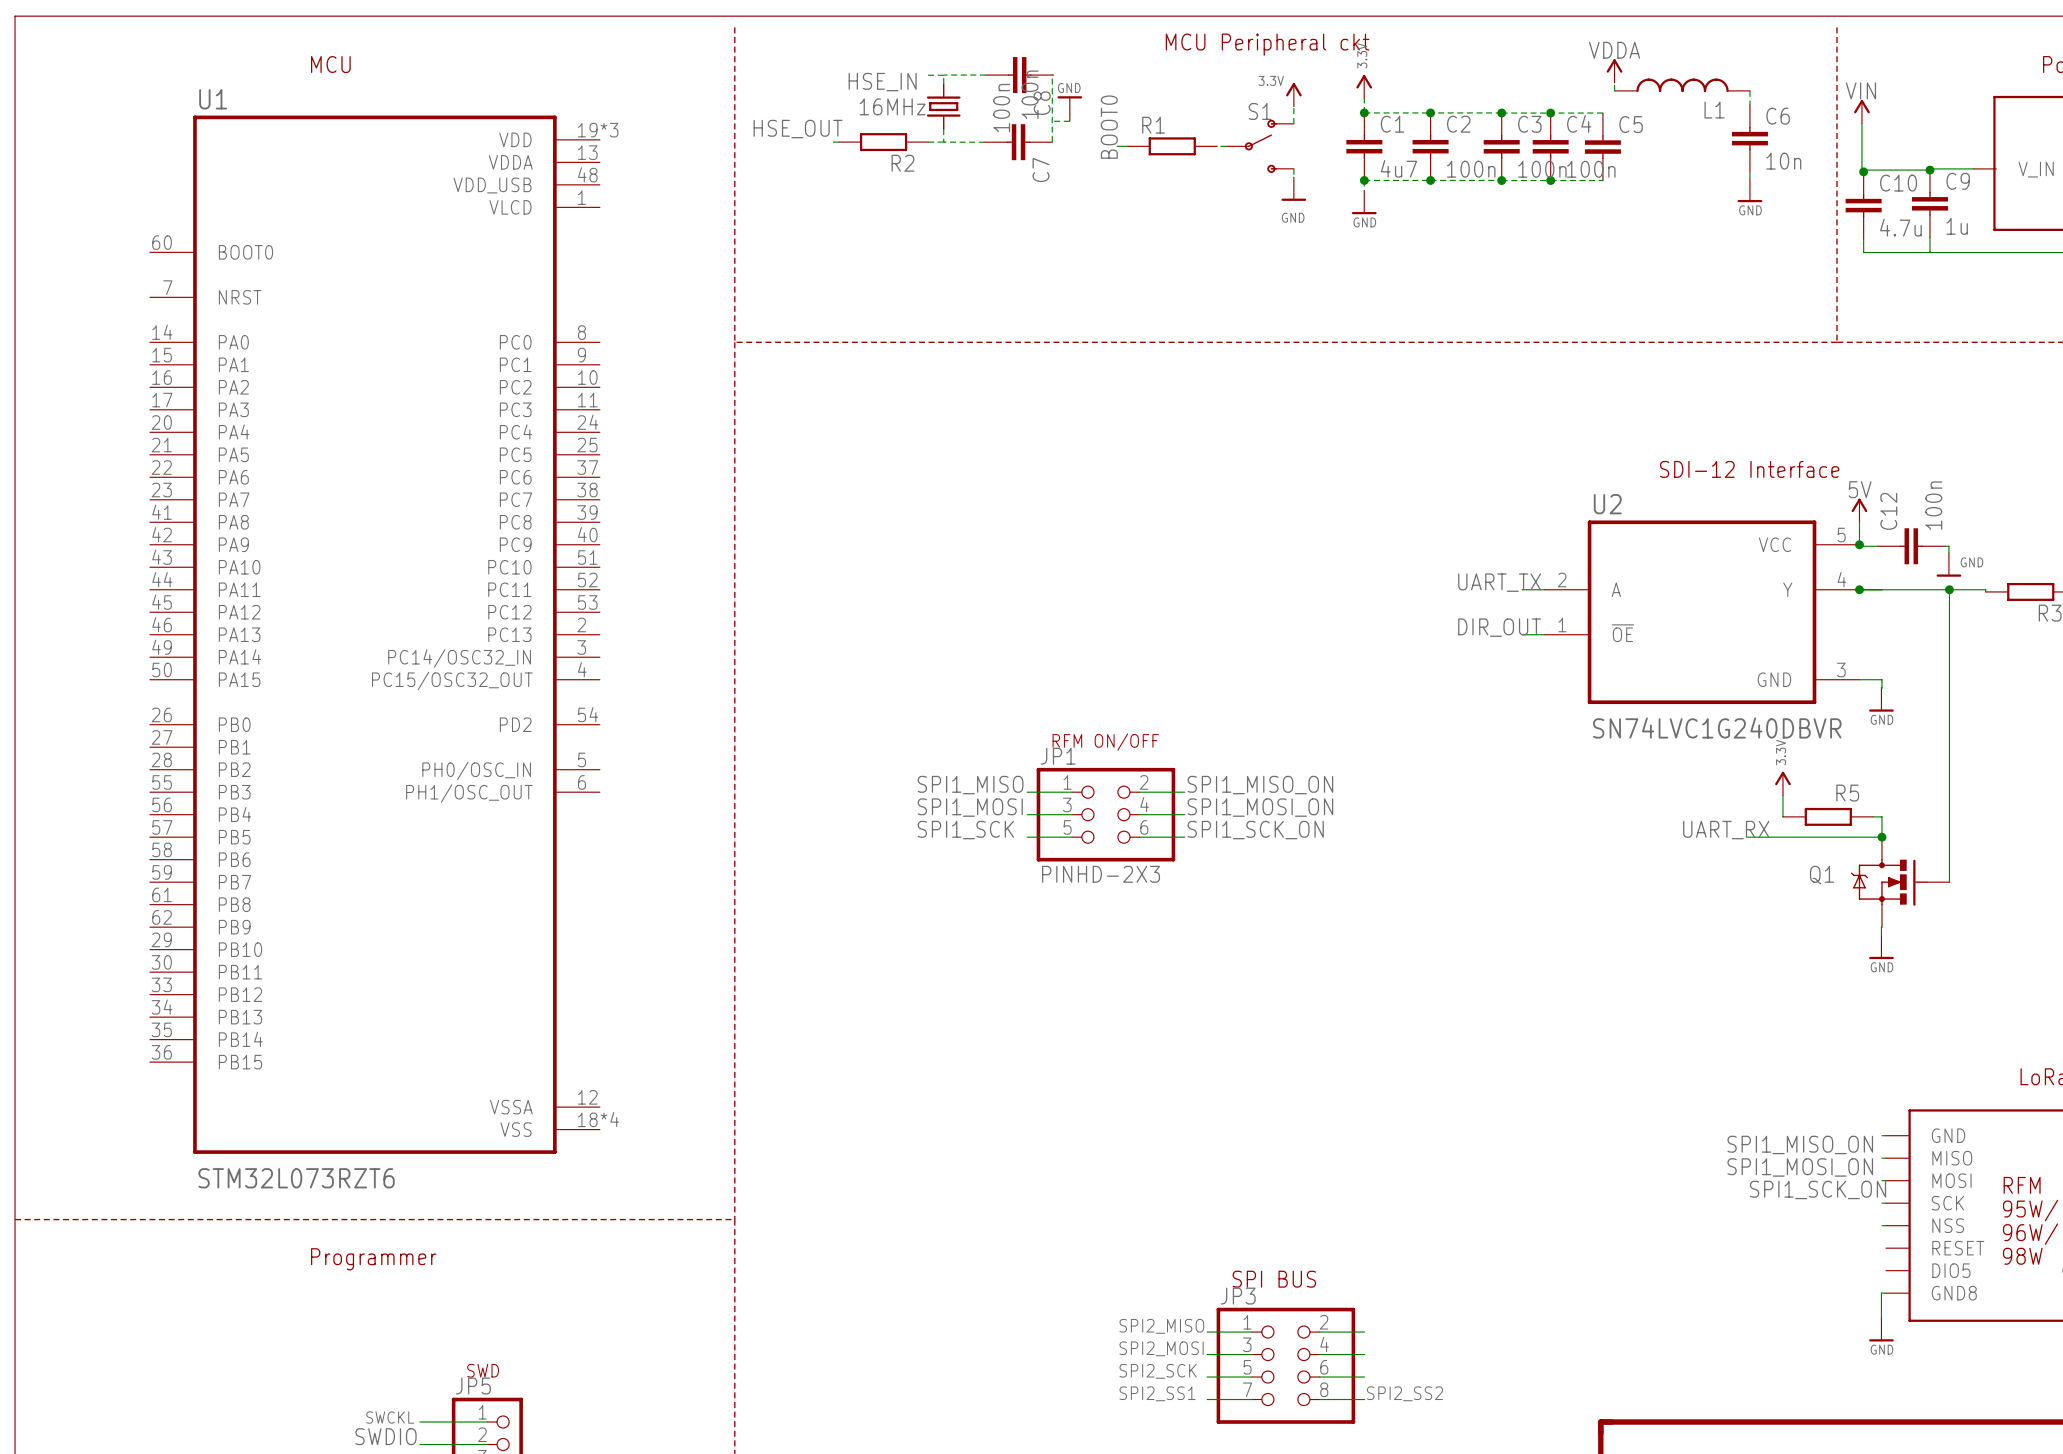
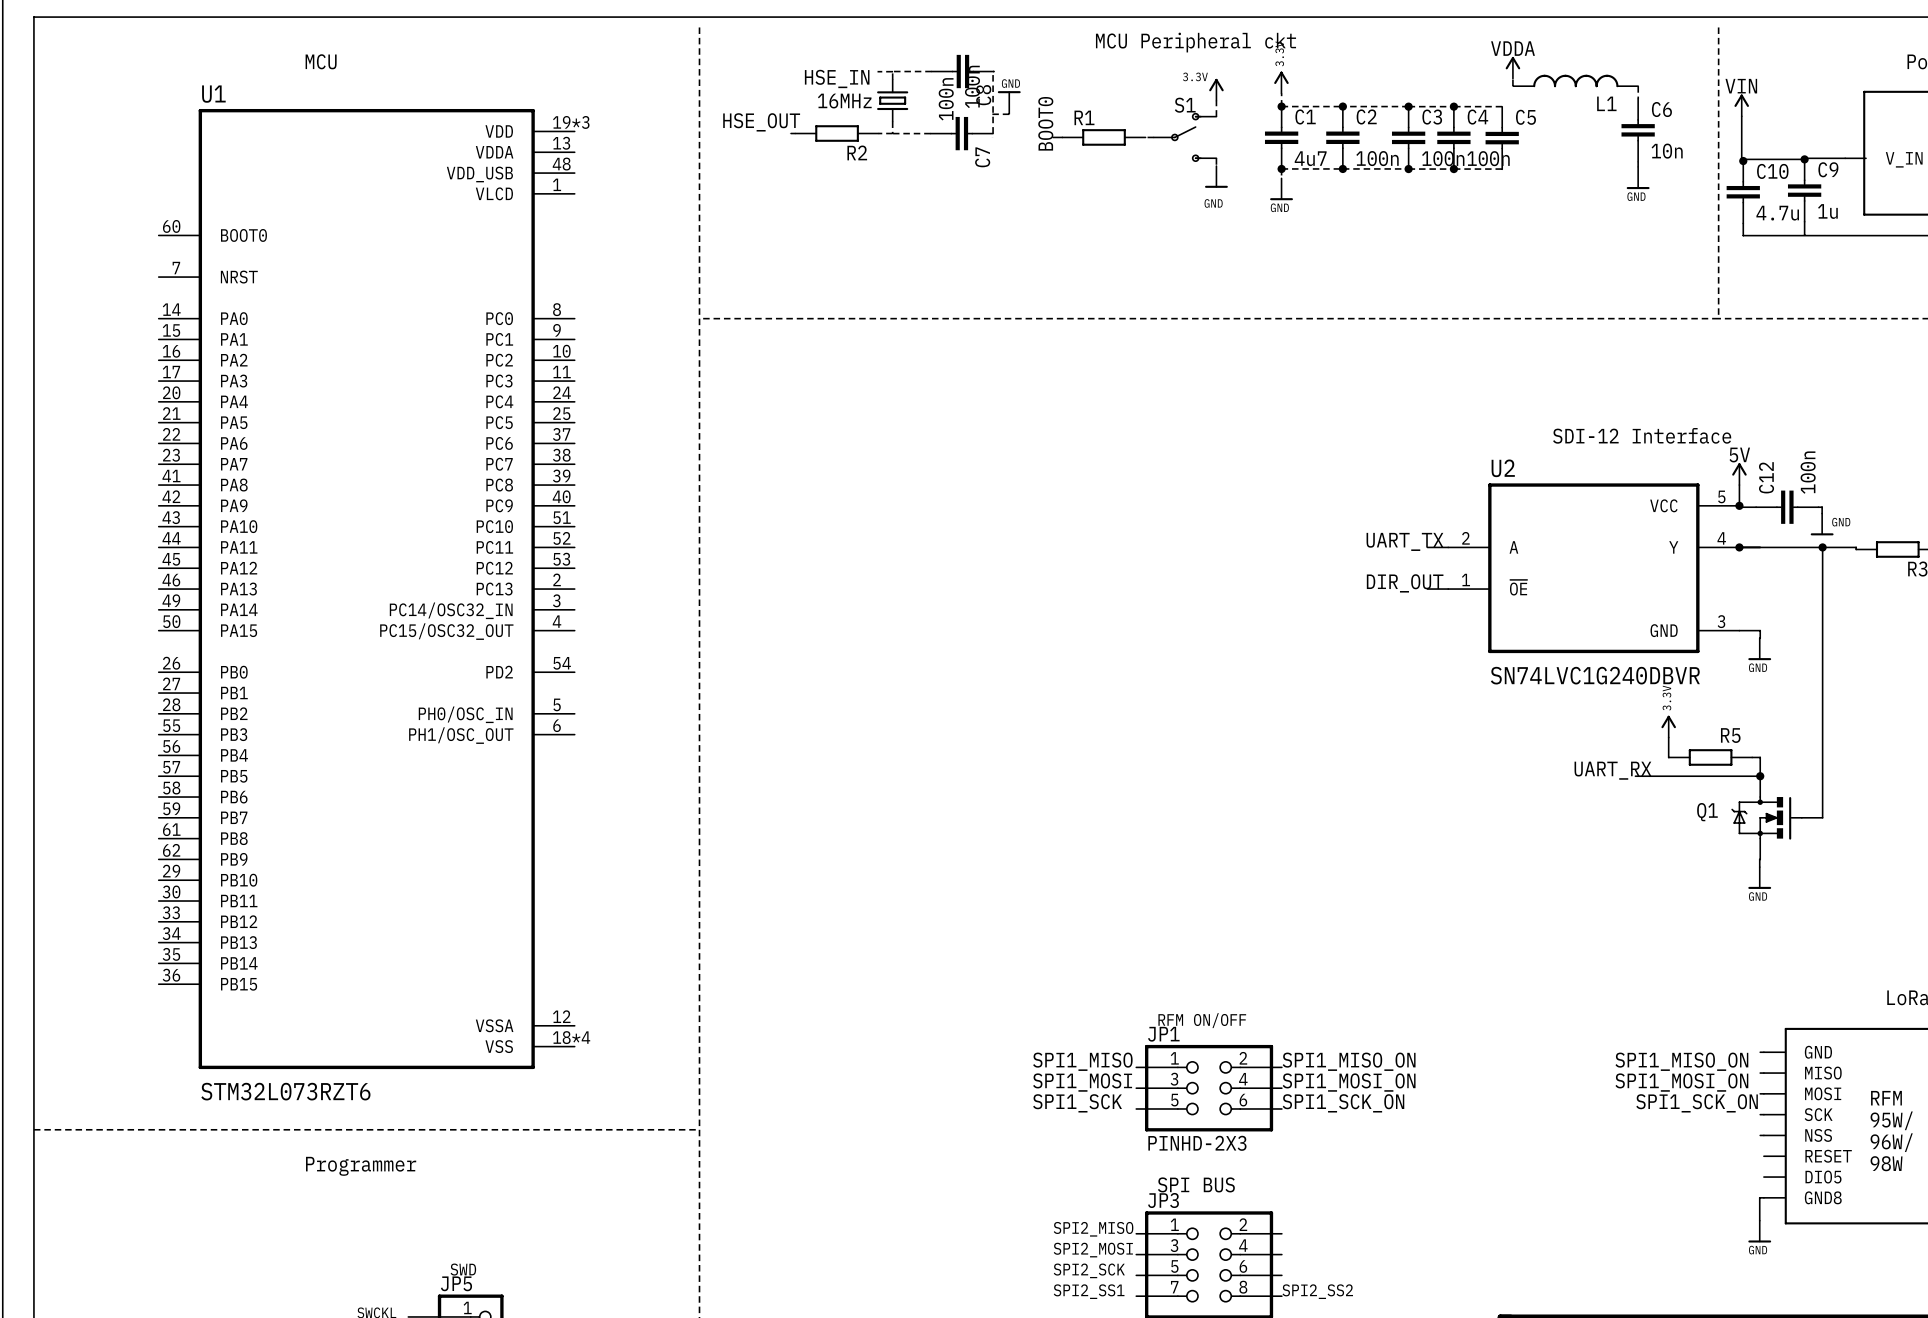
text: RFM ON/OFF (1105, 742) -> none
label: SPI1_MISO (970, 785) -> none
label: SPI1_MISO_ON (1260, 785) -> none
wire: (1027, 792) (1072, 792) -> none
wire: (1139, 792) (1184, 792) -> none
label: SPI1_MOSI (970, 807) -> none
label: SPI1_MOSI_ON (1260, 807) -> none
wire: (1027, 814) (1072, 814) -> none
JP1 position: (1105, 814) -> (1209, 1088)
wire: (1139, 814) (1184, 814) -> none
label: SPI1_SCK (965, 830) -> none
label: SPI1_SCK_ON (1255, 830) -> none
wire: (1027, 837) (1072, 837) -> none
wire: (1139, 837) (1184, 837) -> none
text: none -> RFM ON/OFF (1202, 1020)
label: none -> SPI1_MISO (1082, 1061)
label: none -> SPI1_MISO_ON (1349, 1061)
wire: none -> (1136, 1067) (1177, 1067)
wire: none -> (1240, 1067) (1281, 1067)
label: none -> SPI1_MOSI (1082, 1082)
label: none -> SPI1_MOSI_ON (1349, 1082)
wire: none -> (1136, 1088) (1177, 1088)
wire: none -> (1240, 1088) (1281, 1088)
label: none -> SPI1_SCK (1077, 1103)
label: none -> SPI1_SCK_ON (1343, 1103)
wire: none -> (1136, 1108) (1177, 1108)
wire: none -> (1240, 1108) (1281, 1108)

